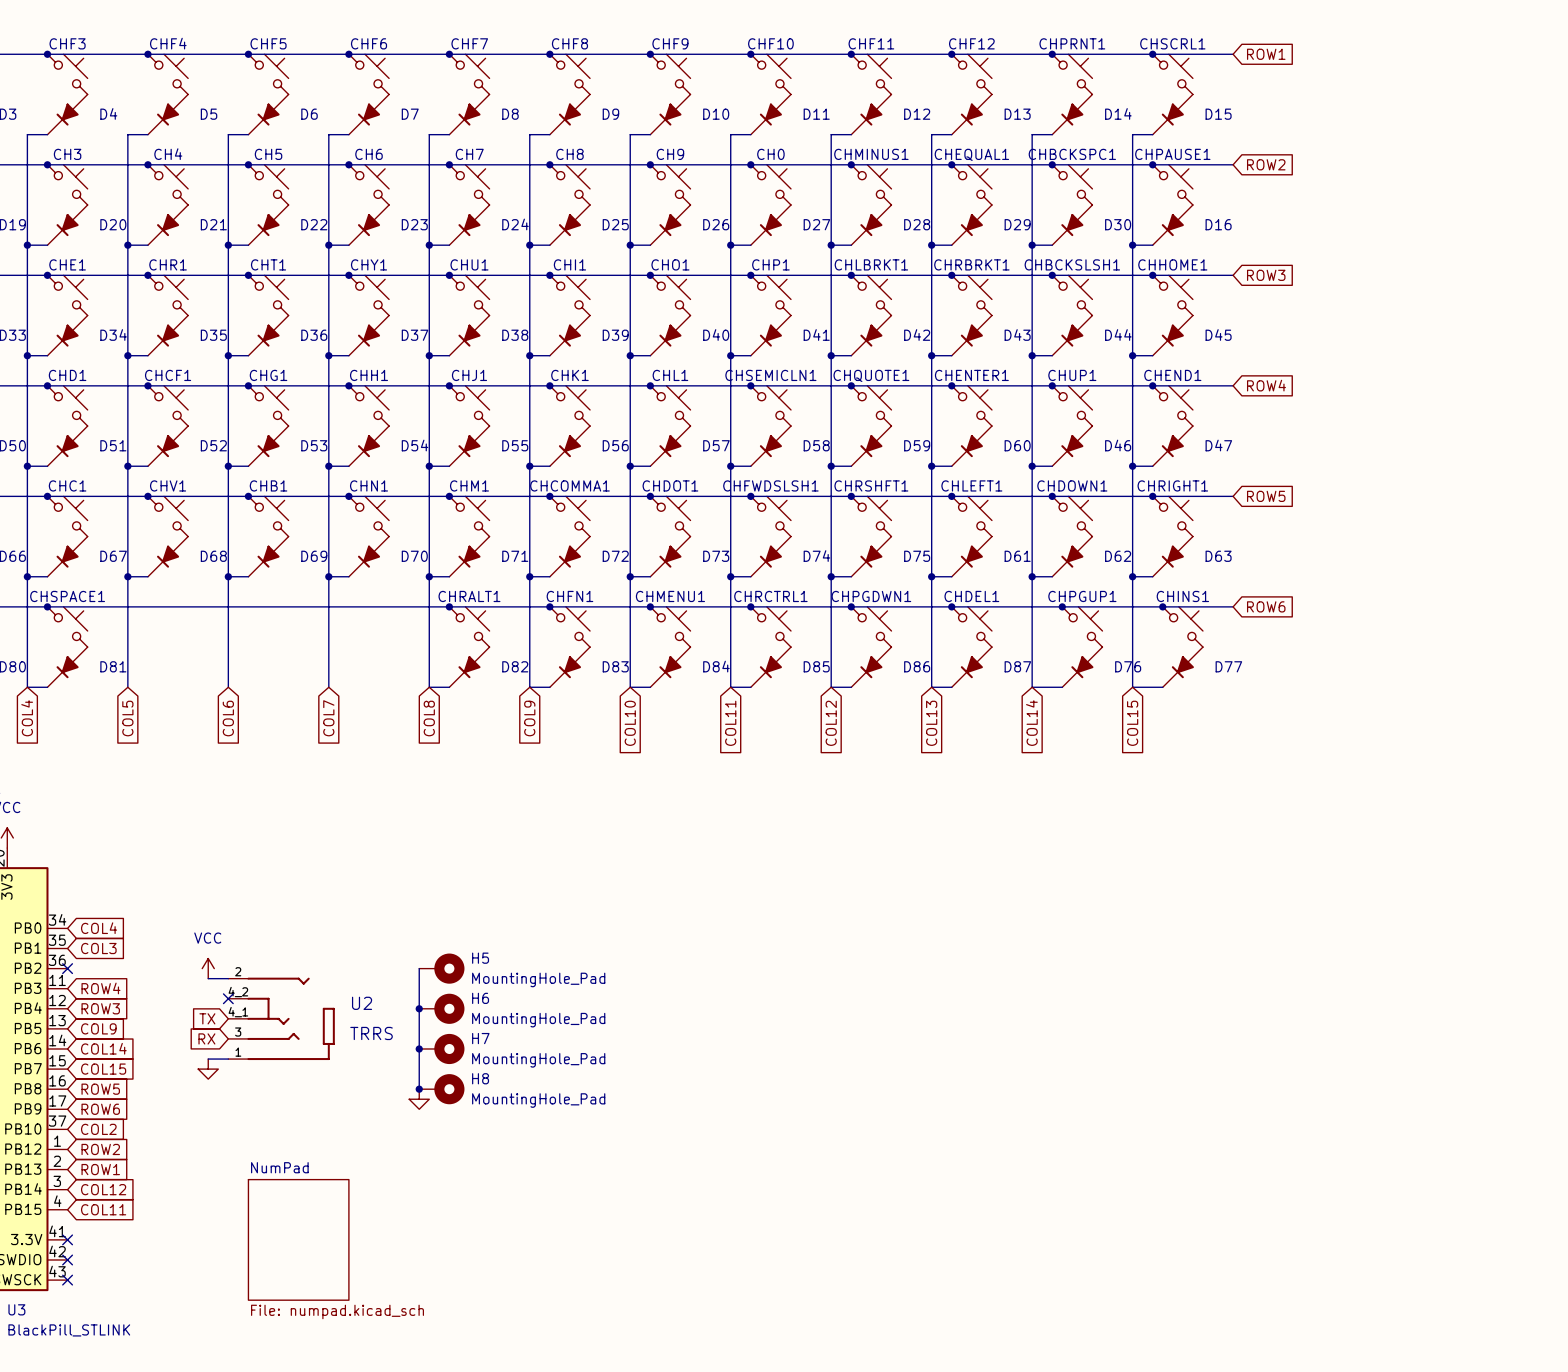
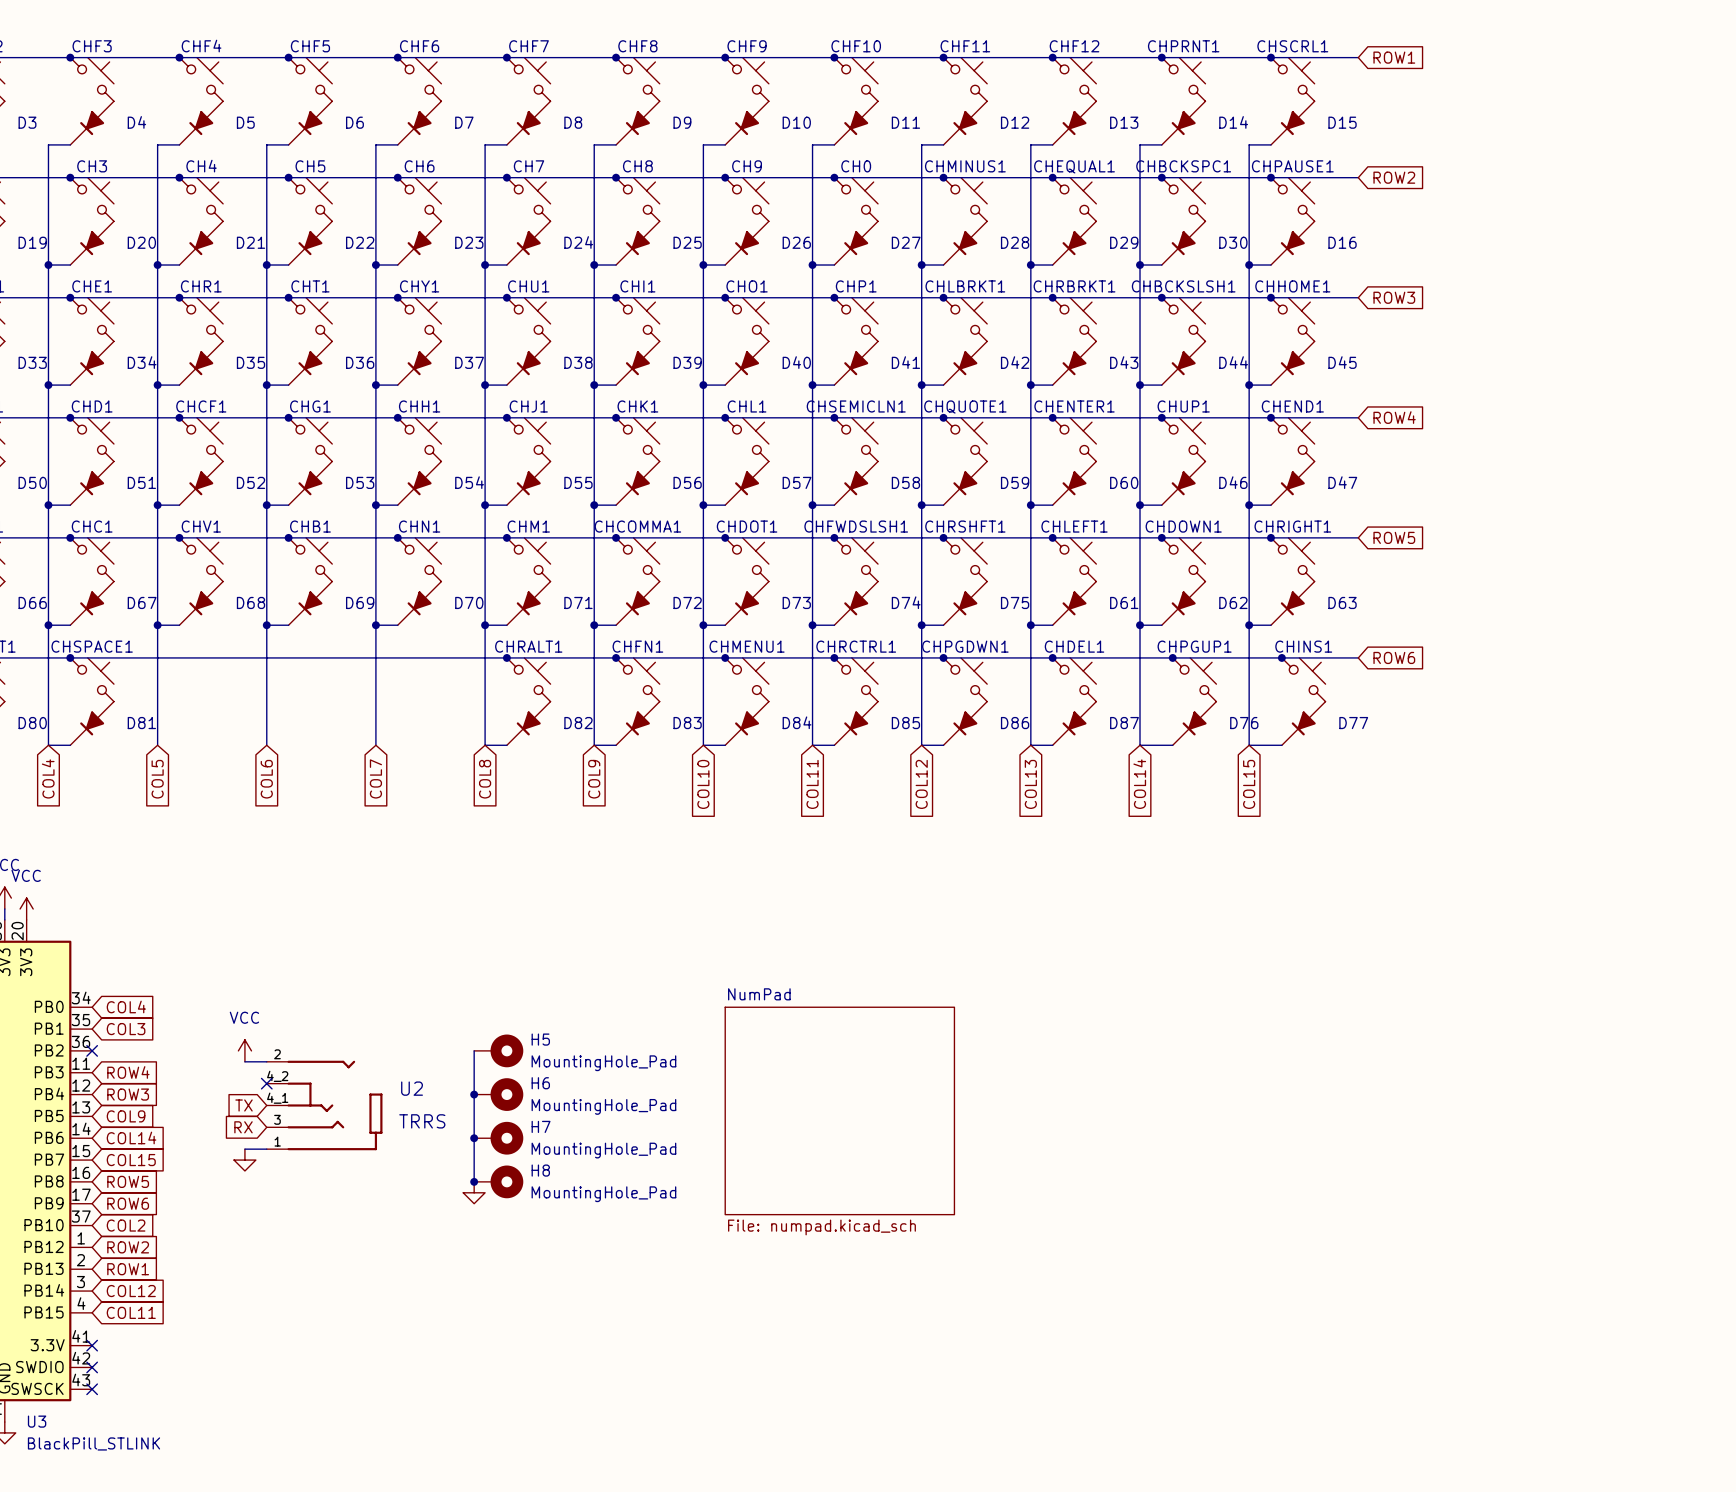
sheet NumPad: none -> File: numpad.kicad_sch (839, 1110)
sheet NumPad: File: numpad.kicad_sch (298, 1239) -> none

